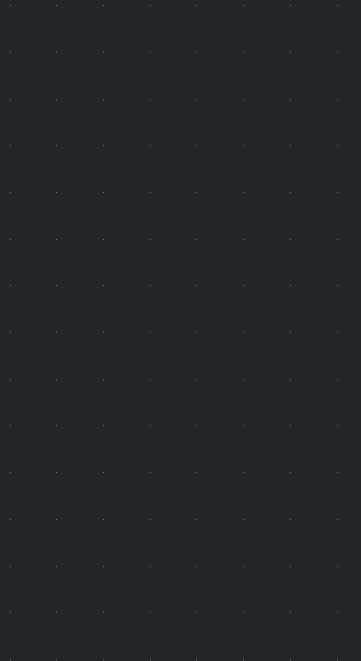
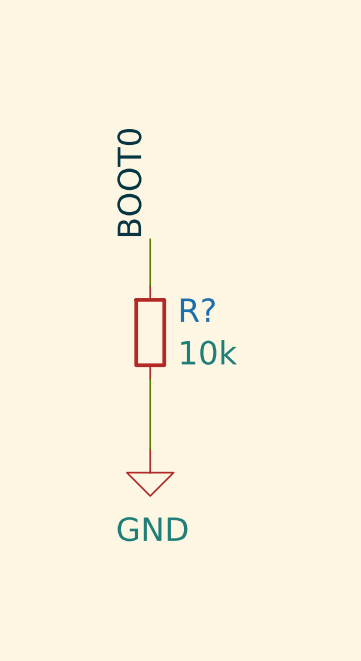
label: none -> BOOT0 (129, 182)
wire: none -> (150, 239) (150, 285)
R?: none -> 10k (150, 332)
wire: none -> (150, 379) (150, 449)
power symbol: none -> GND (150, 472)

